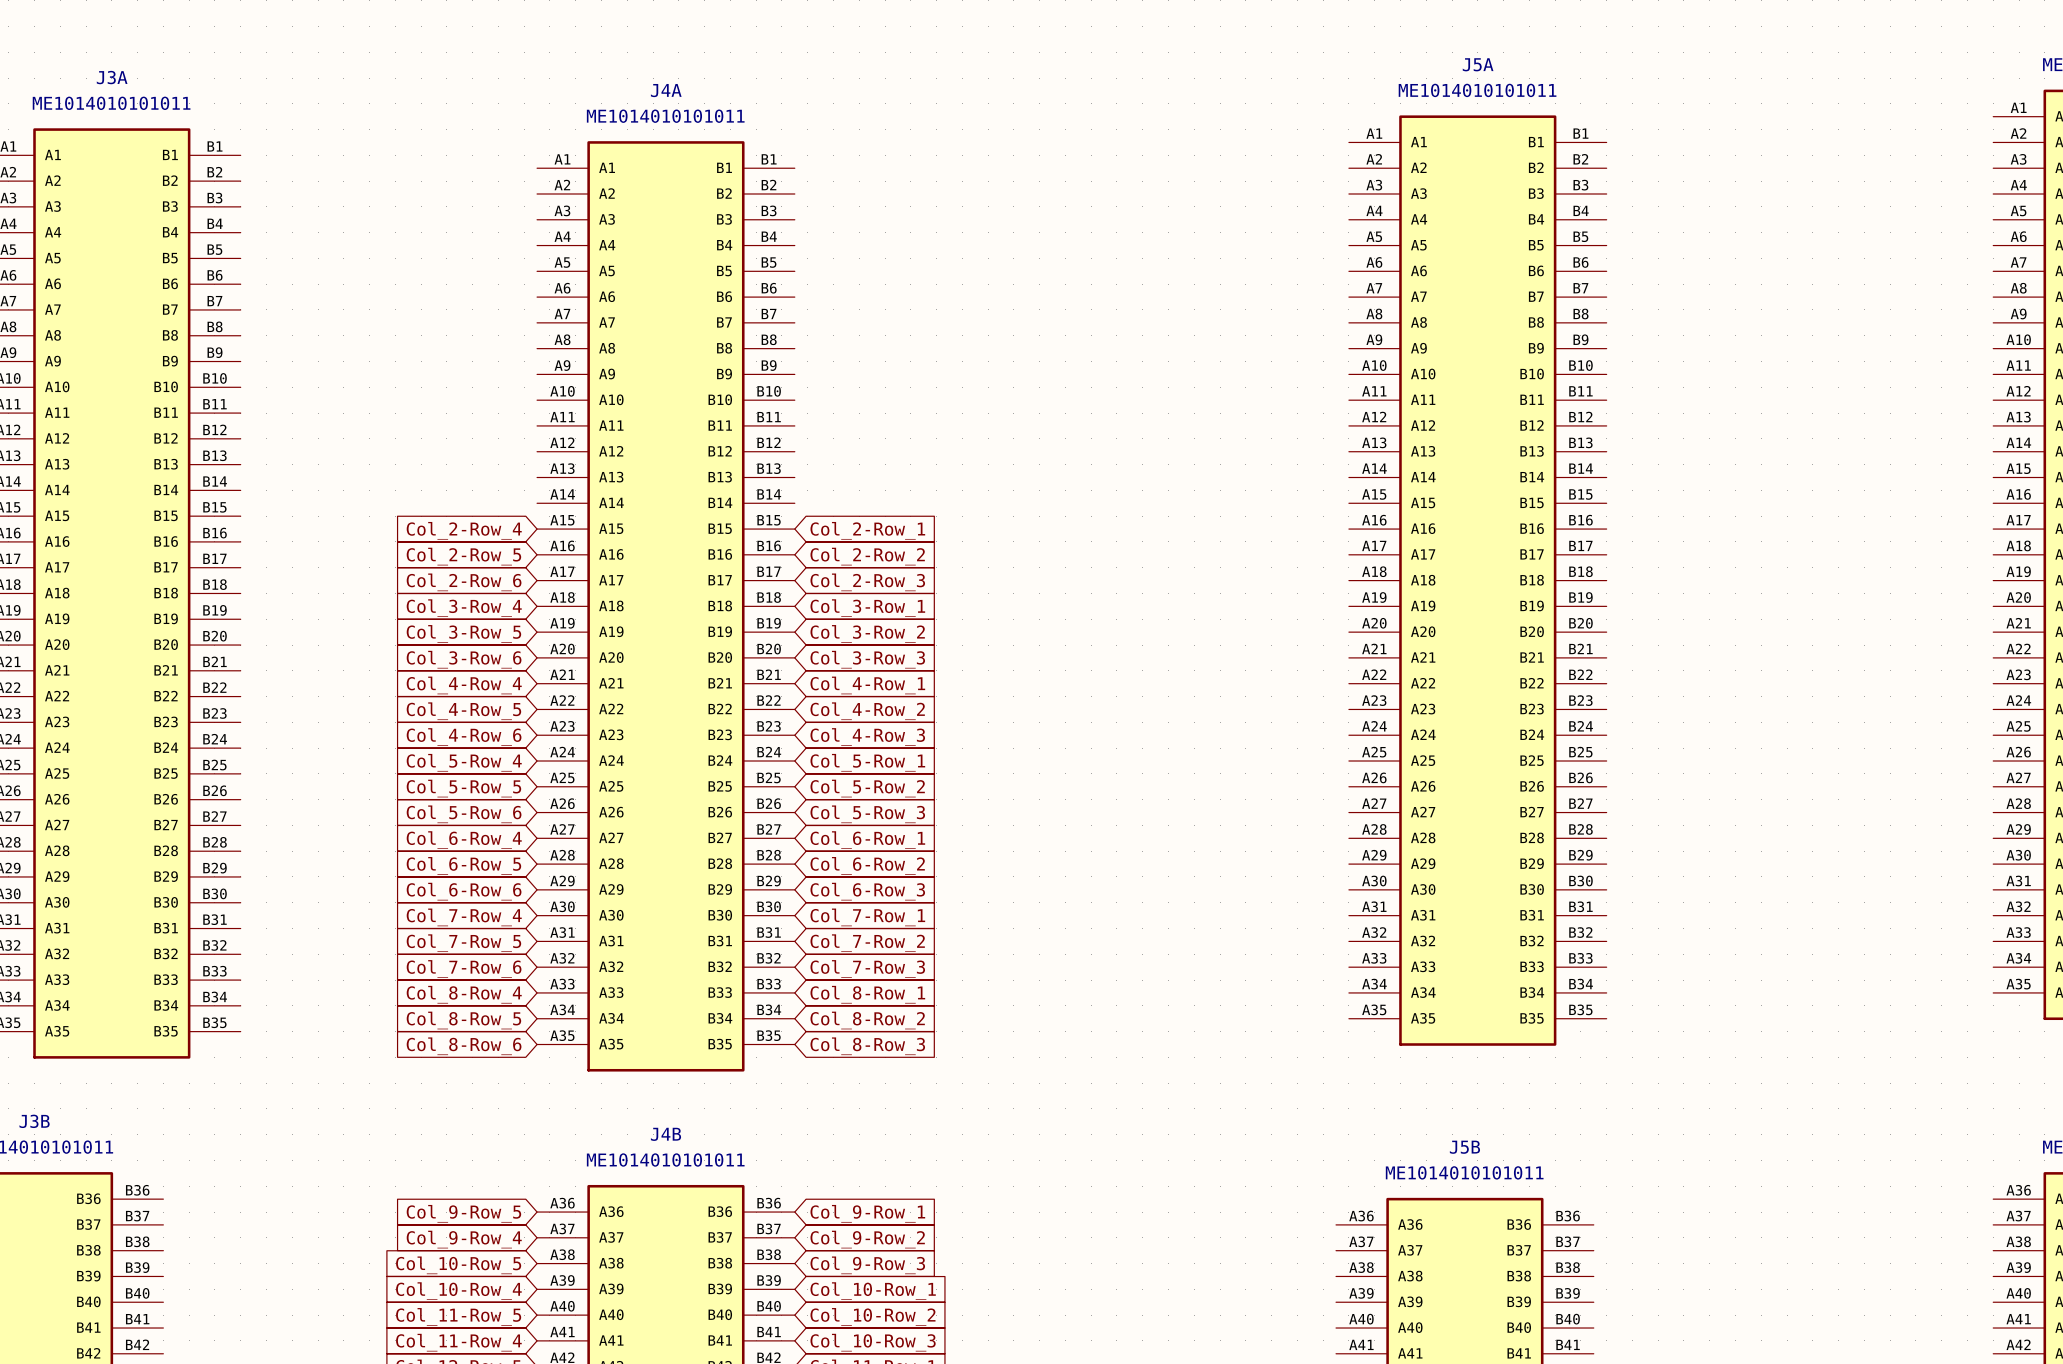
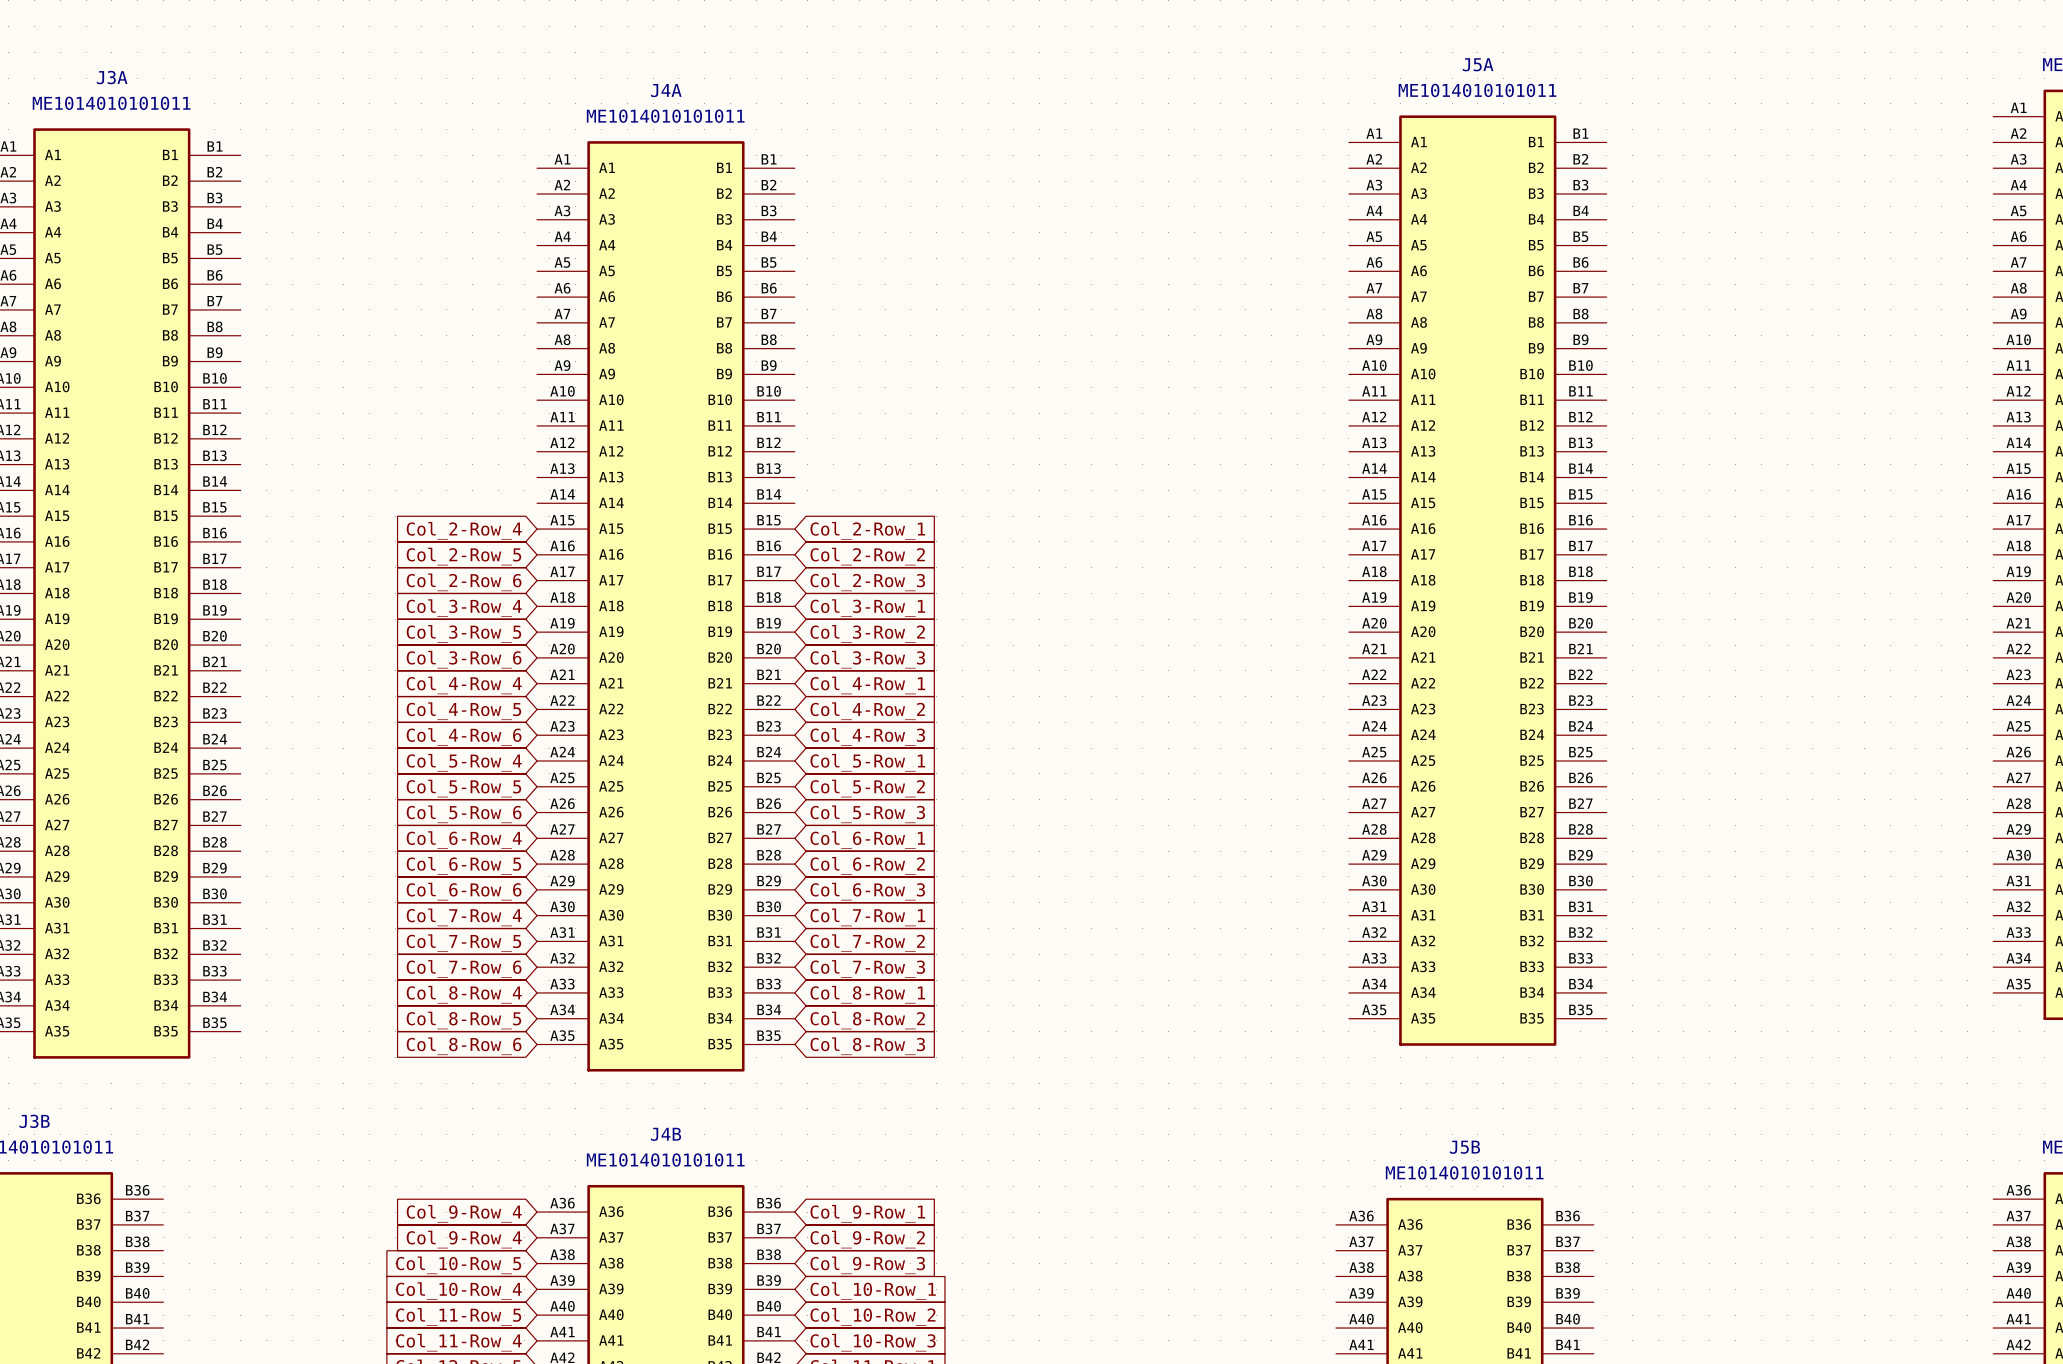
global label: Col_9-Row_5 (463, 1213) -> Col_9-Row_4 (464, 1213)

